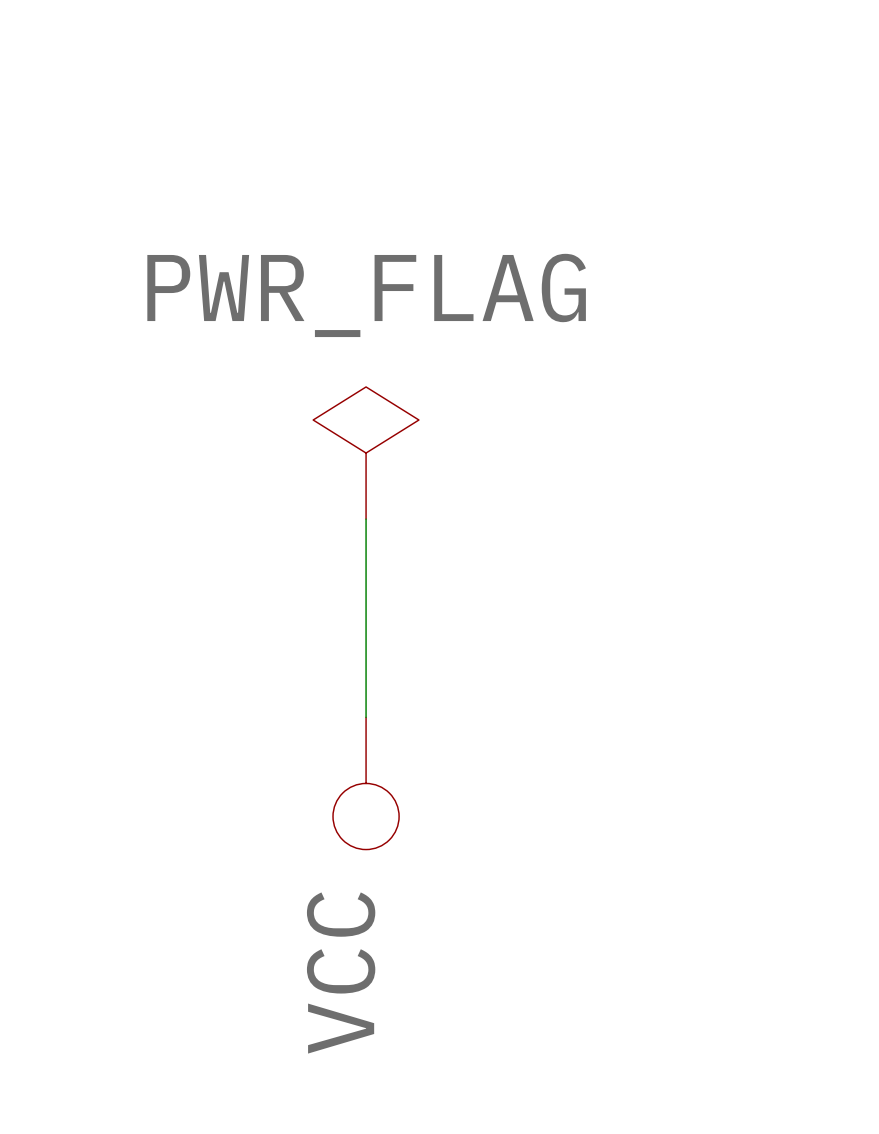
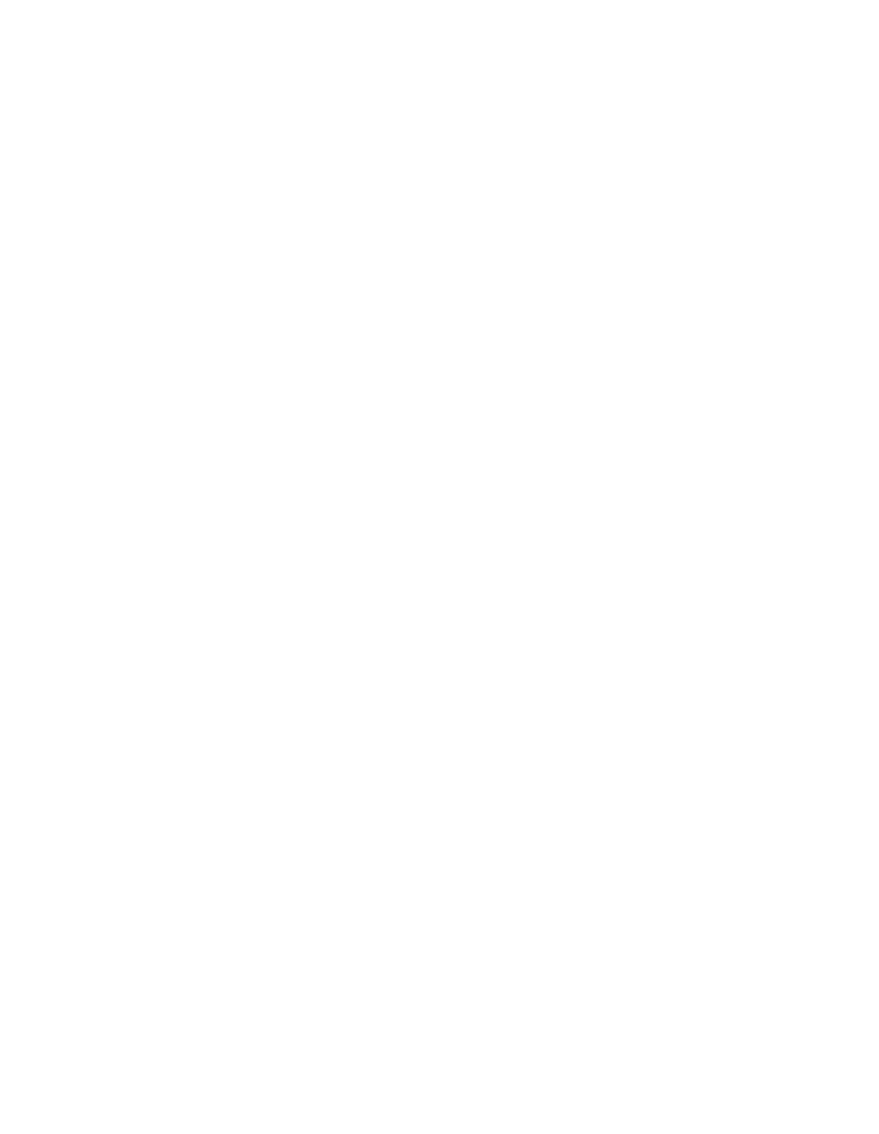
power symbol: PWR_FLAG (366, 453) -> none
wire: (366, 519) (366, 717) -> none
power symbol: VCC (366, 783) -> none

